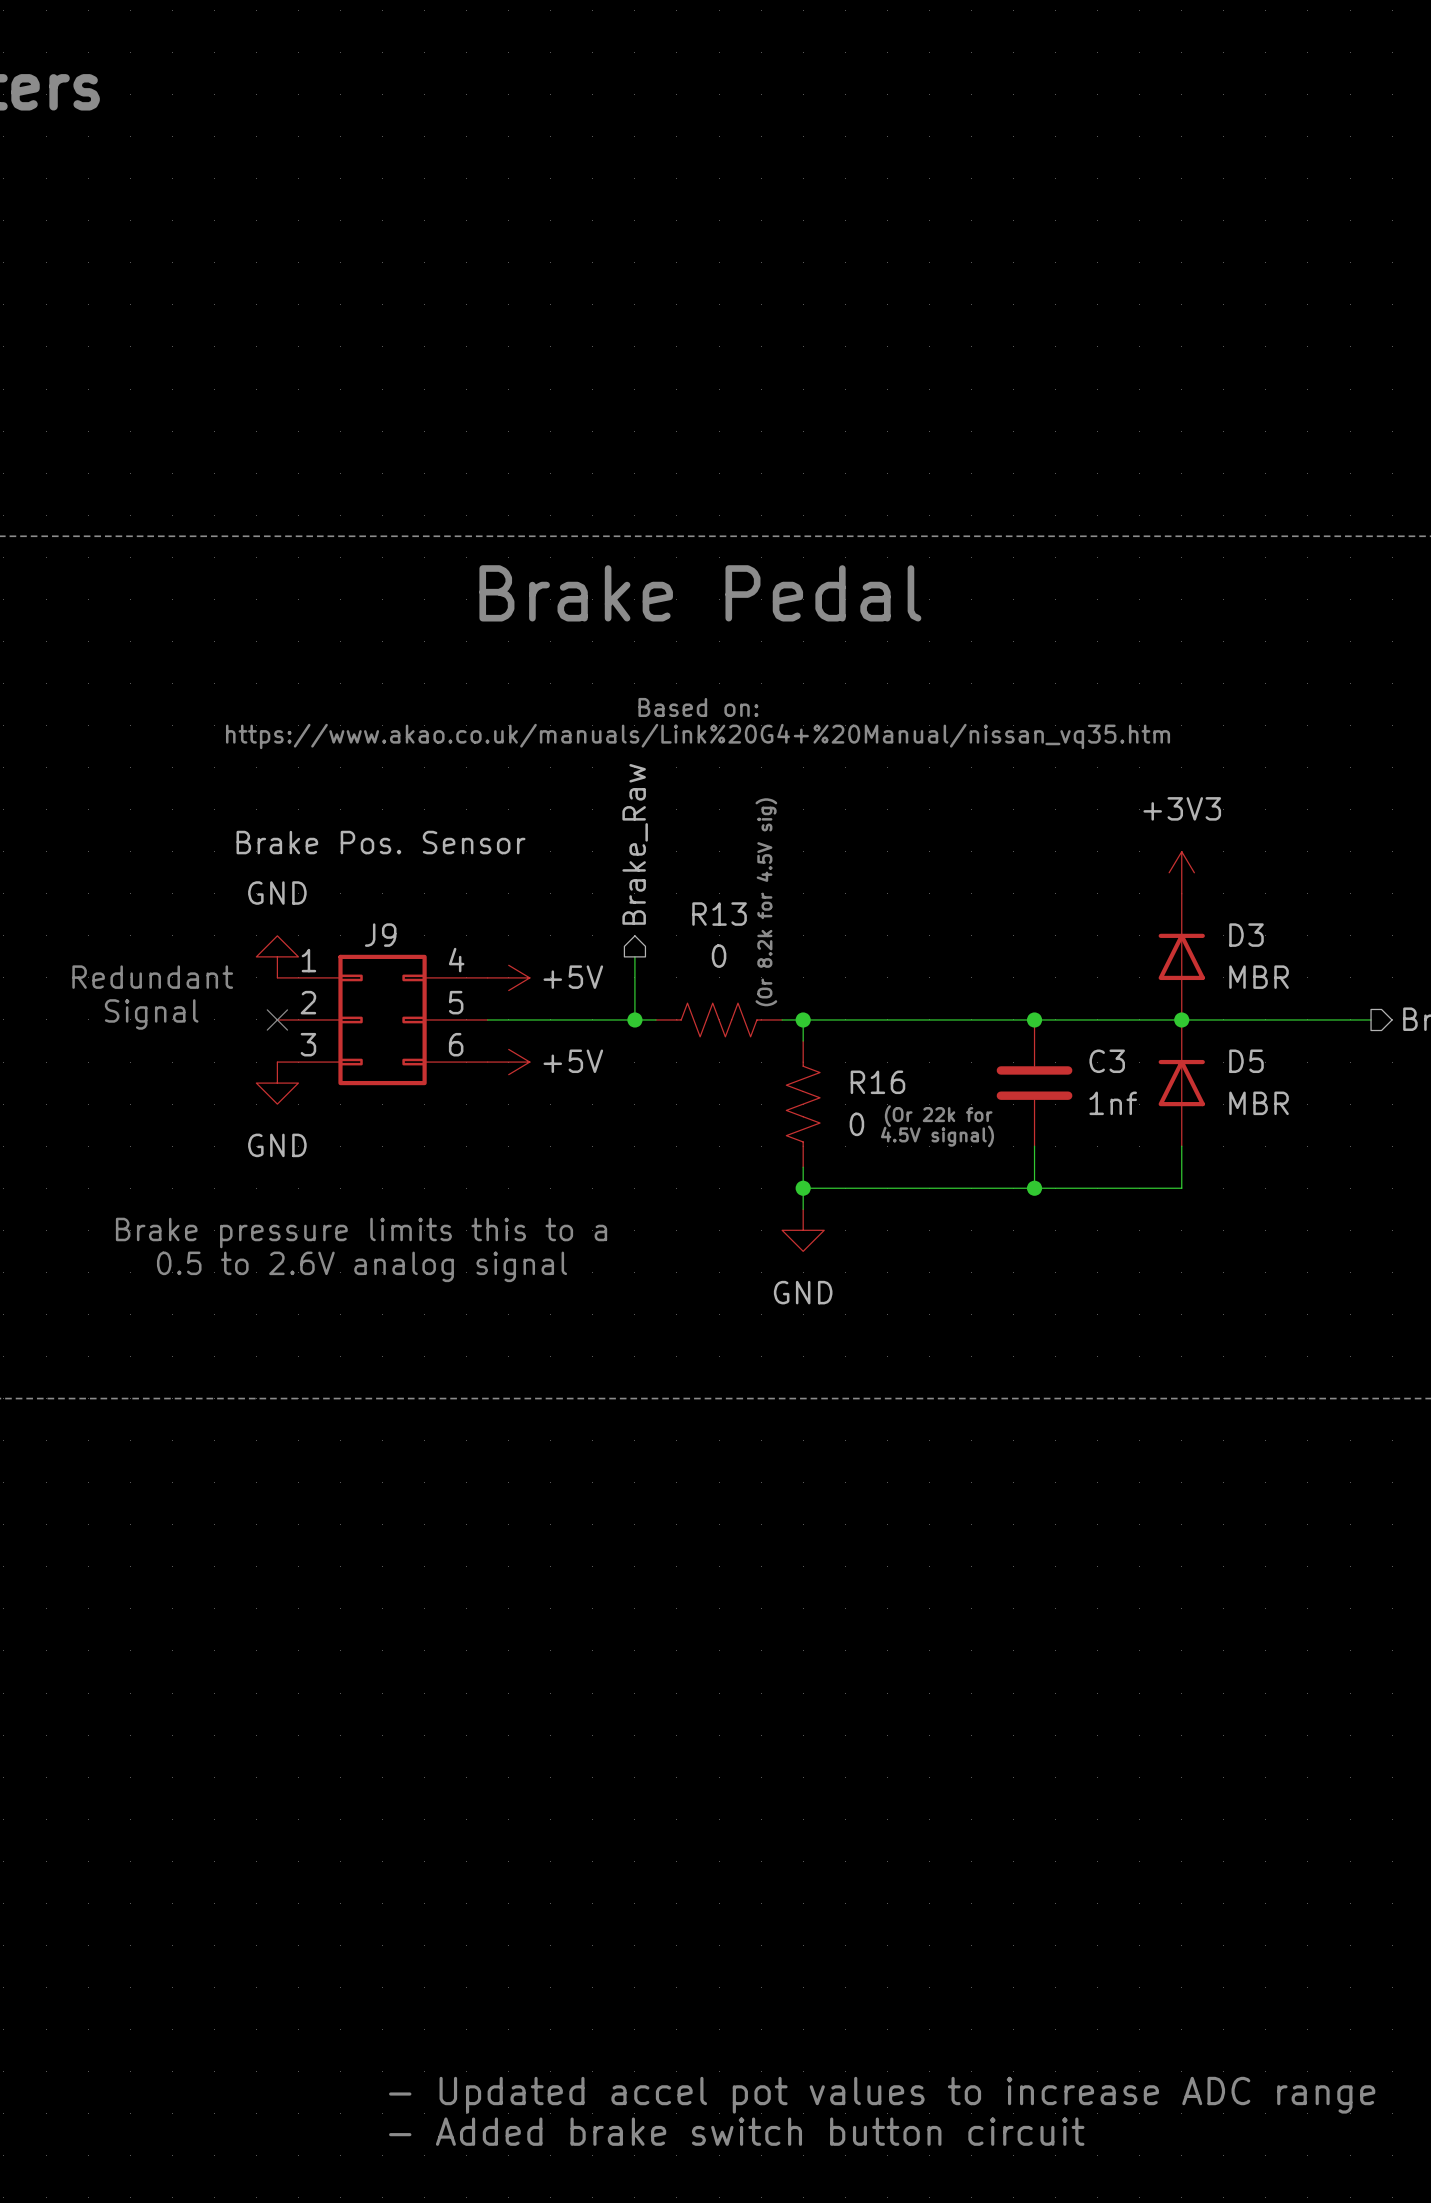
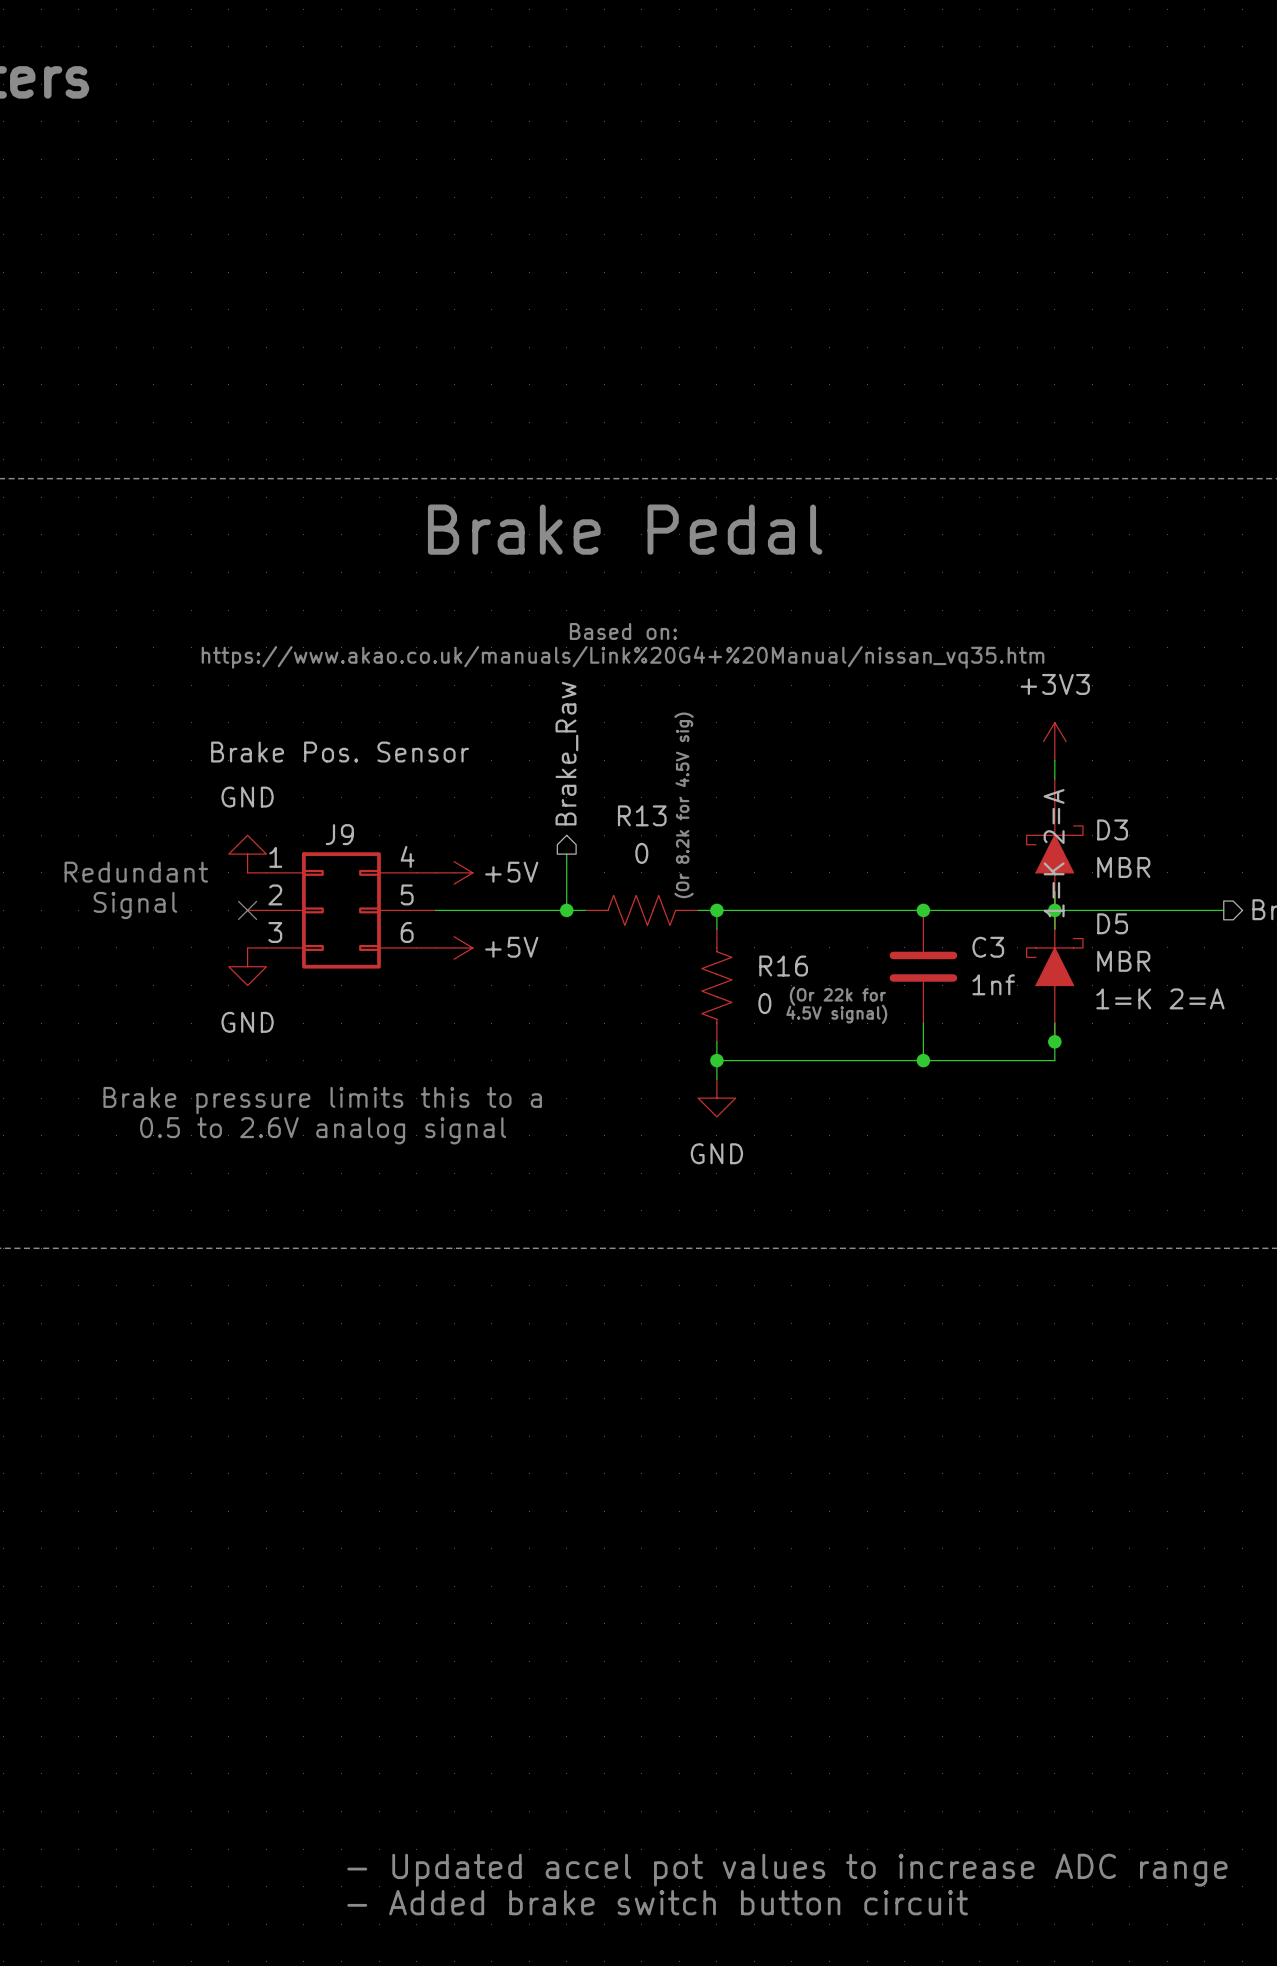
power symbol position: +3V3 (1181, 872) -> +3V3 (1054, 741)
D3 symbol: [1158, 893, 1205, 1020] -> [1026, 779, 1083, 930]
D3 text: none -> 1=K 2=A (1054, 853)
D5 symbol: [1158, 1019, 1205, 1147] -> [1026, 891, 1083, 1042]
D5 text: none -> 1=K 2=A (1160, 998)
junction: none -> (1054, 1041)

